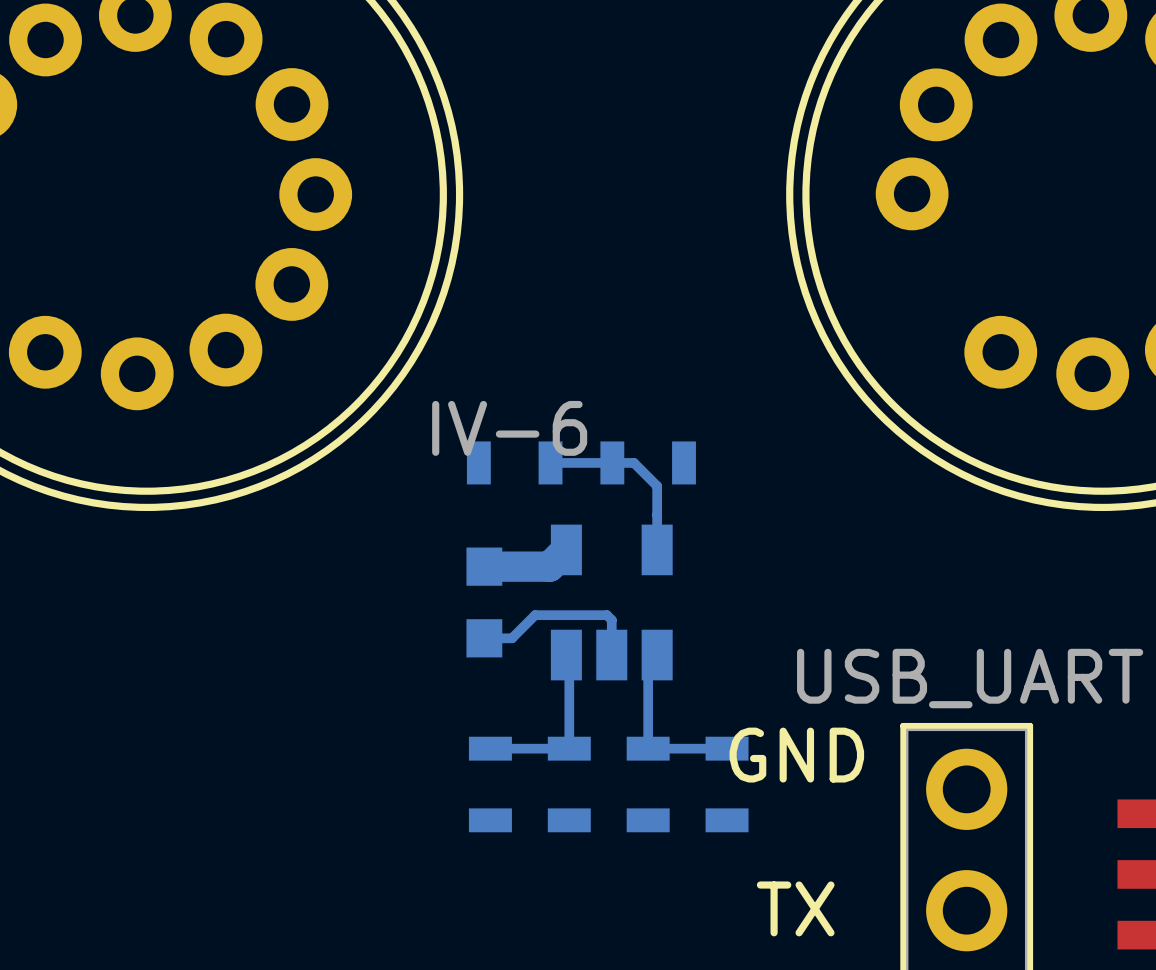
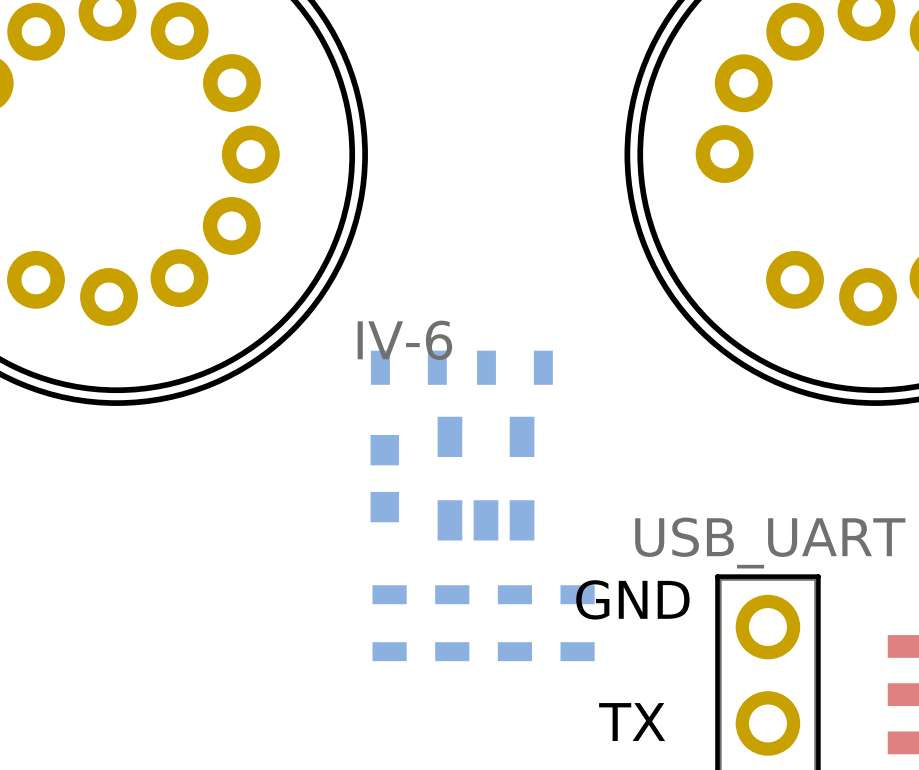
bottom track: (550, 462) (634, 462) (657, 486) (657, 549) -> none
bottom track: (566, 549) (549, 566) (484, 566) -> none
bottom track: (484, 638) (511, 638) (535, 615) (606, 615) (611, 620) (611, 655) -> none
bottom track: (566, 655) (569, 657) (569, 748) (490, 748) -> none
bottom track: (657, 655) (648, 664) (648, 748) (727, 748) -> none

